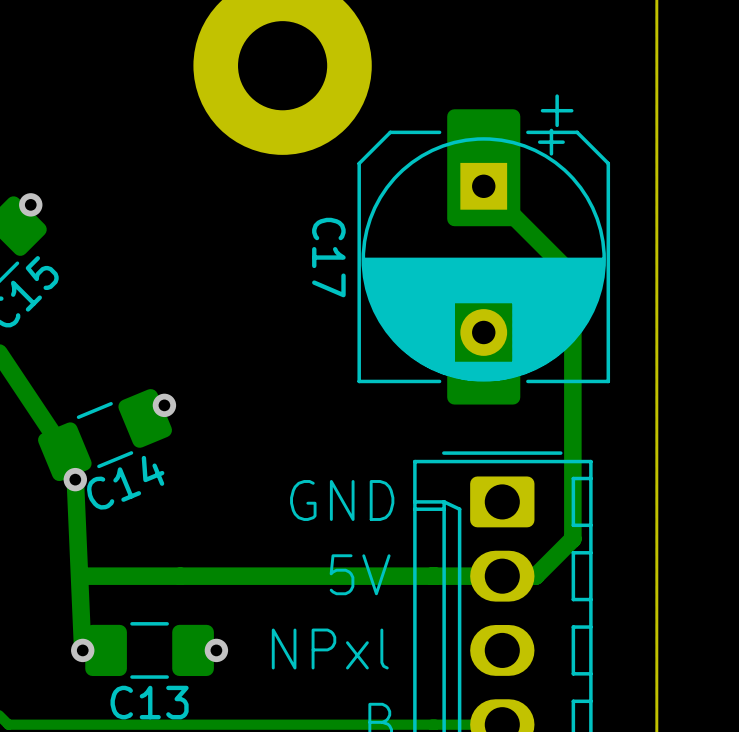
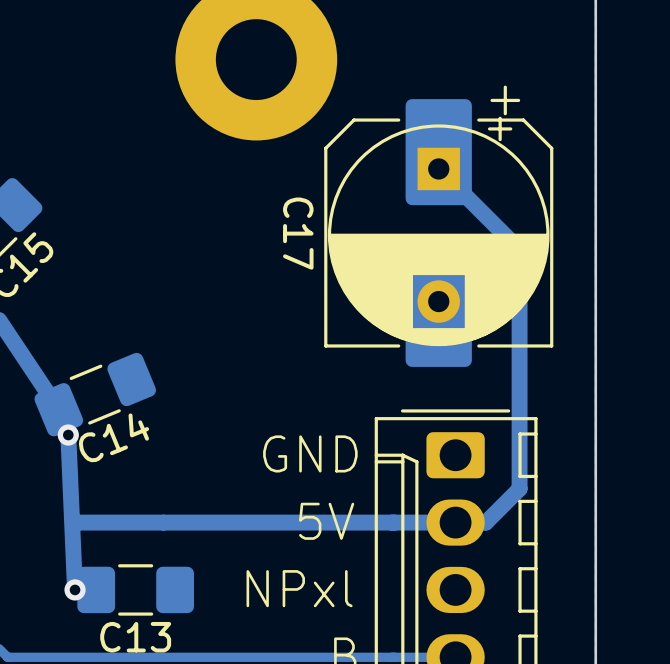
via: (30, 204) -> none
via: (164, 405) -> none
via: (216, 650) -> none

